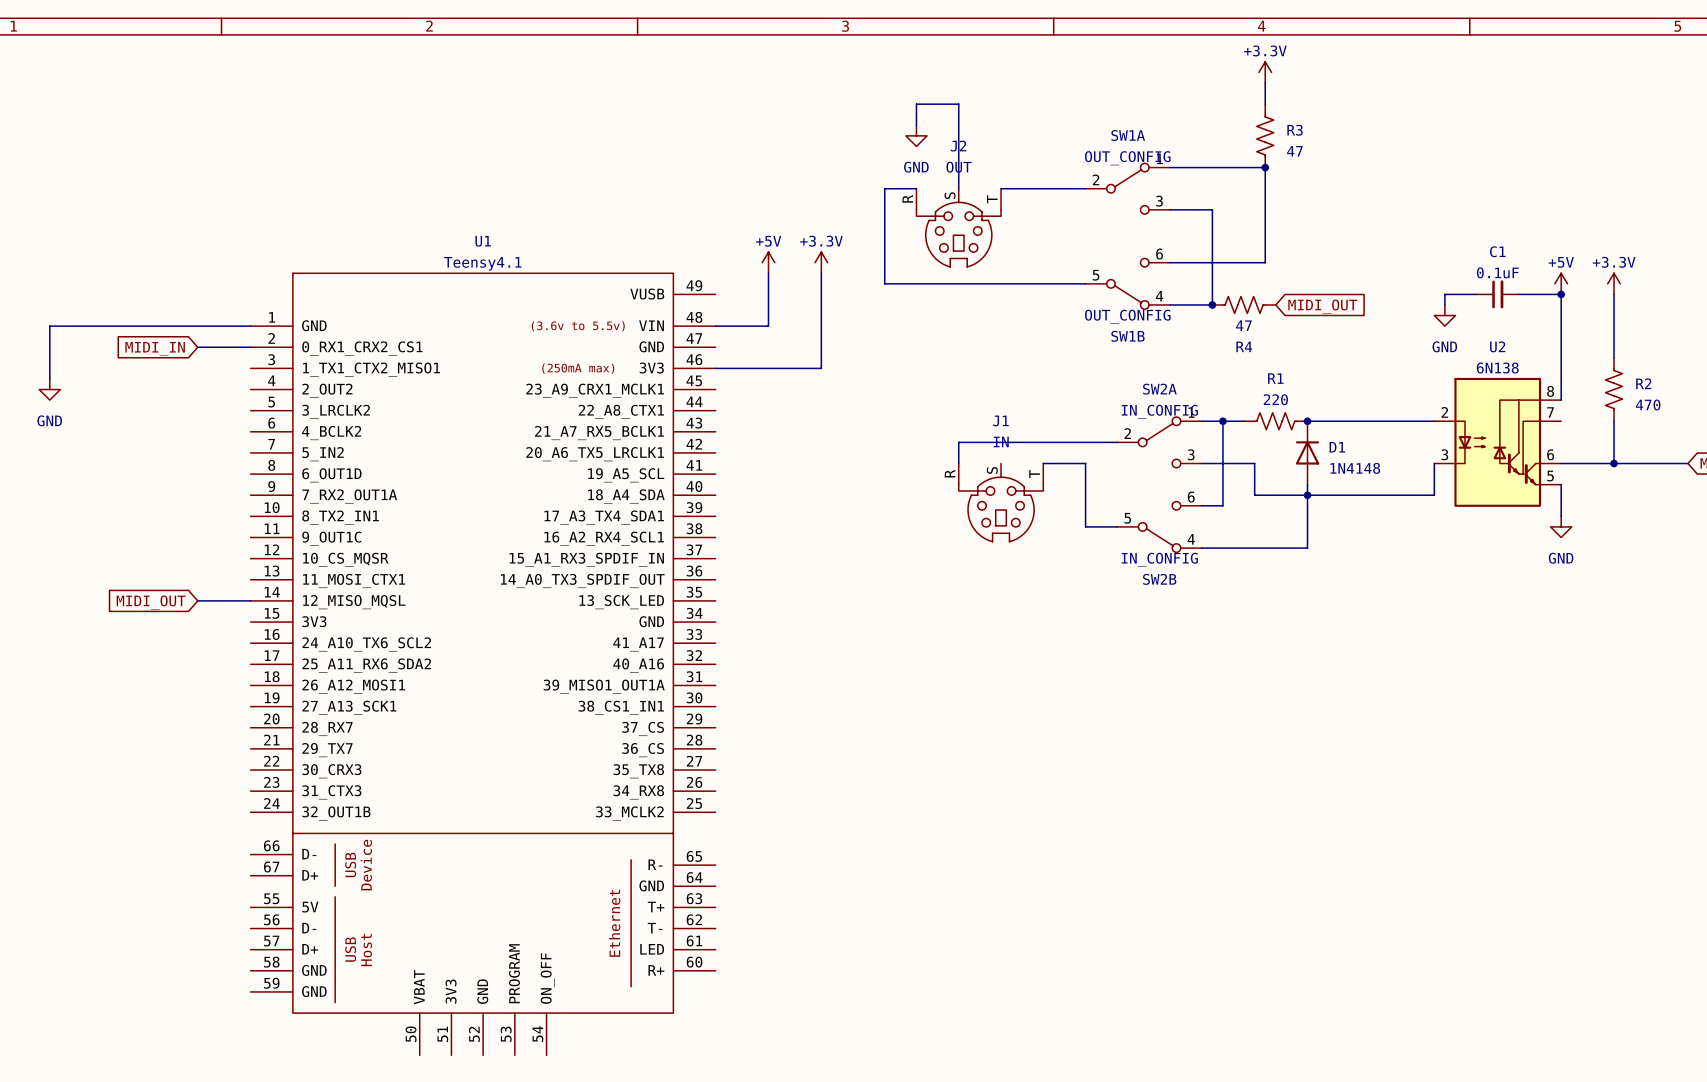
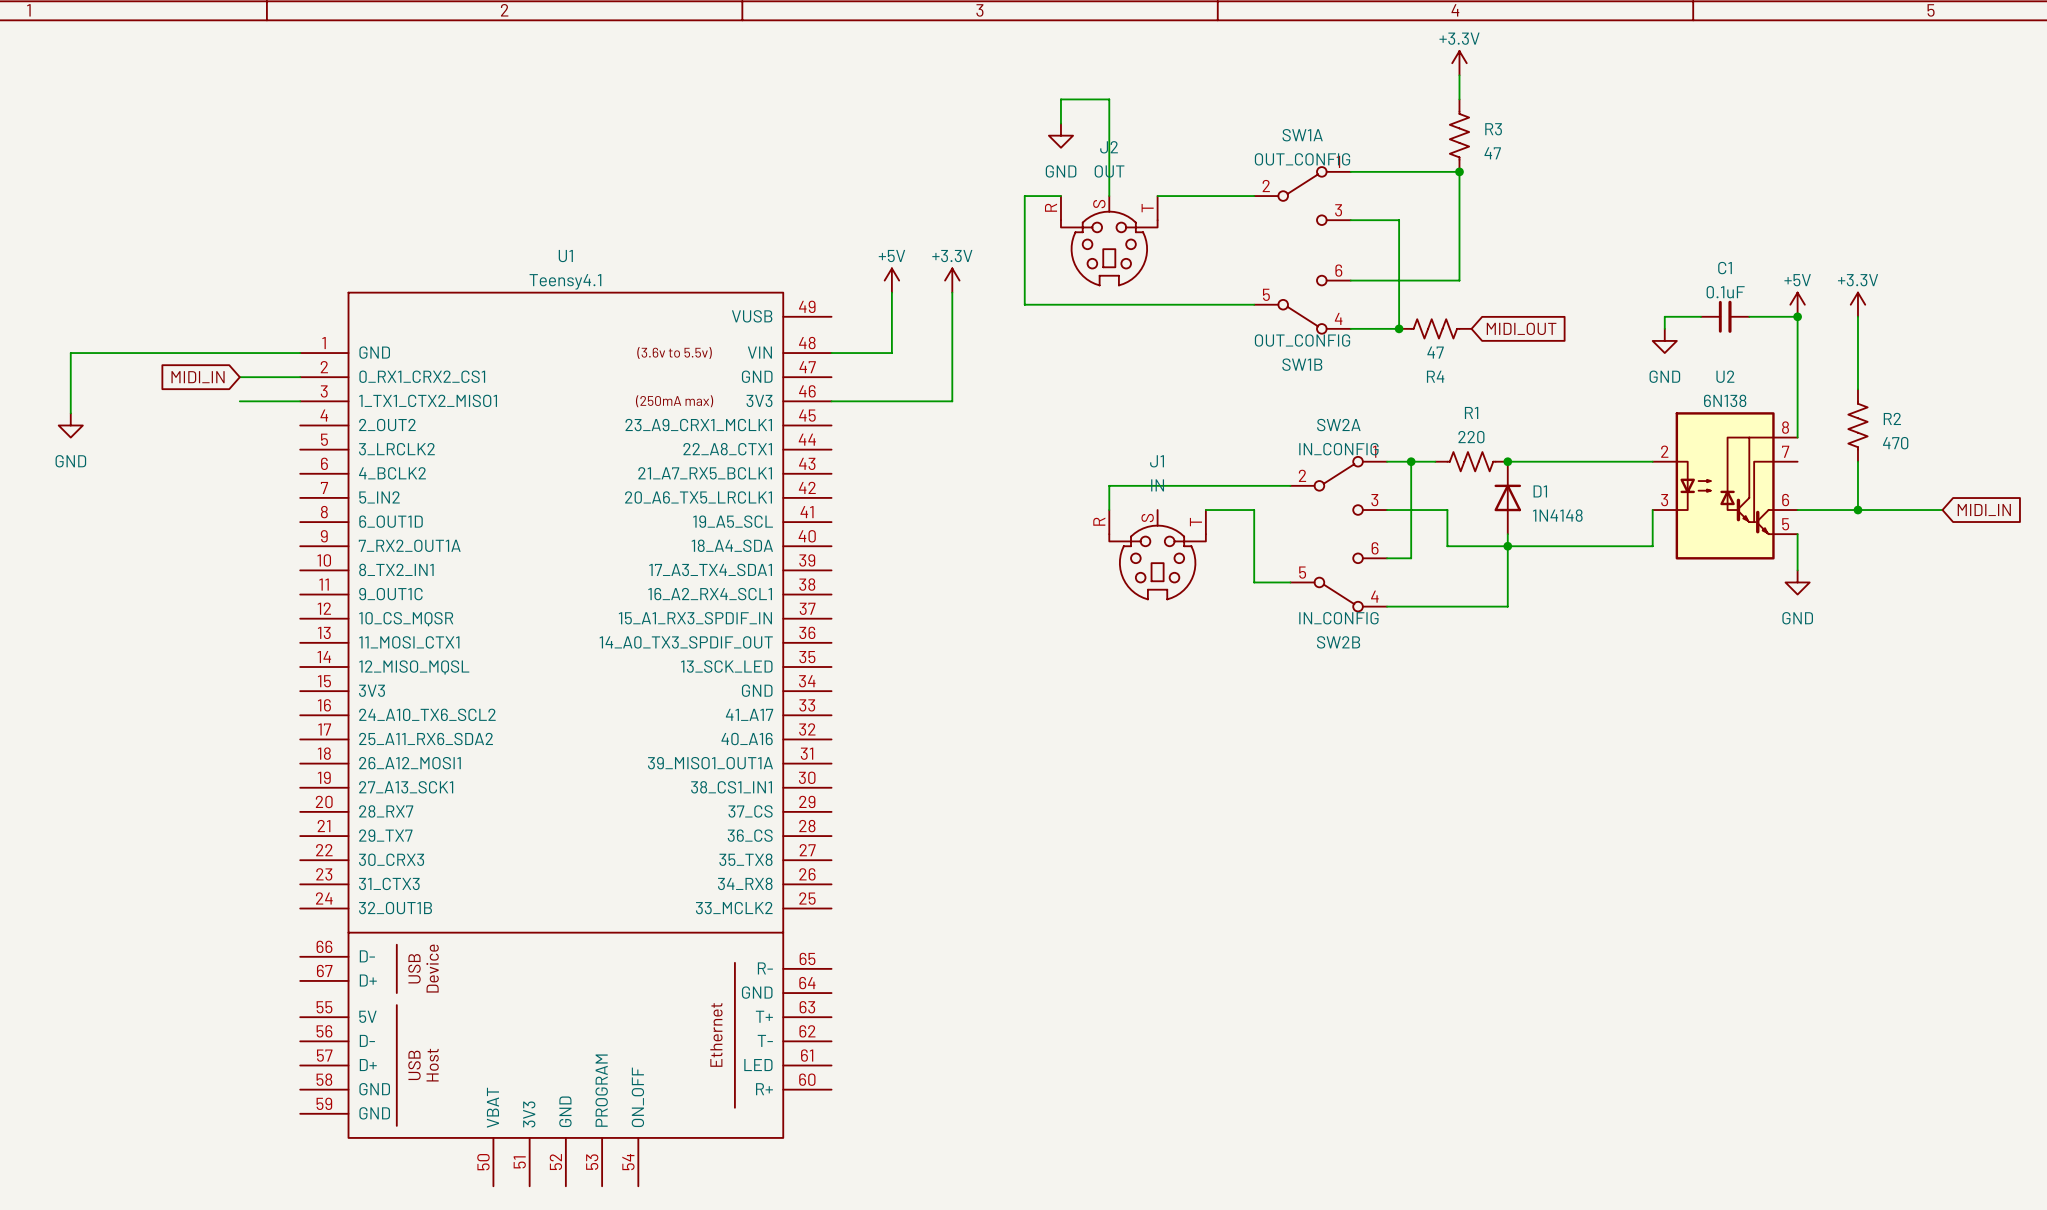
wire: none -> (239, 401) (300, 401)
wire: (197, 600) (250, 600) -> none
global label: MIDI_OUT (151, 602) -> none

